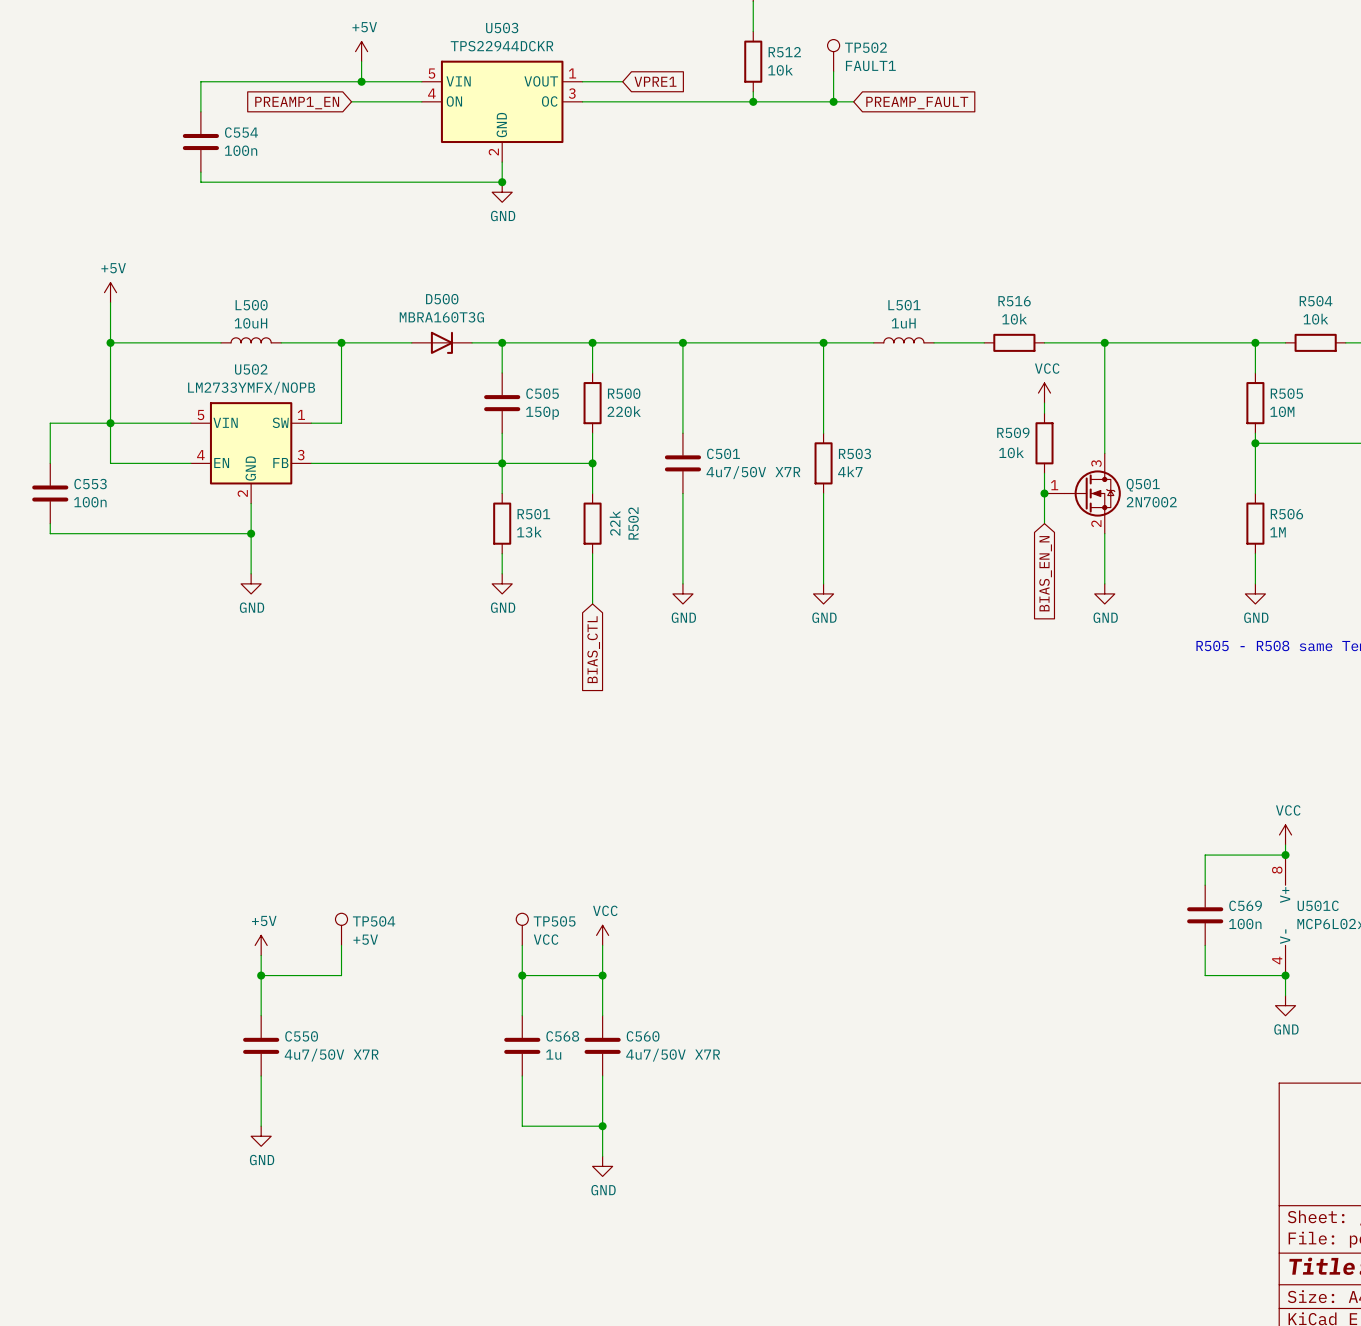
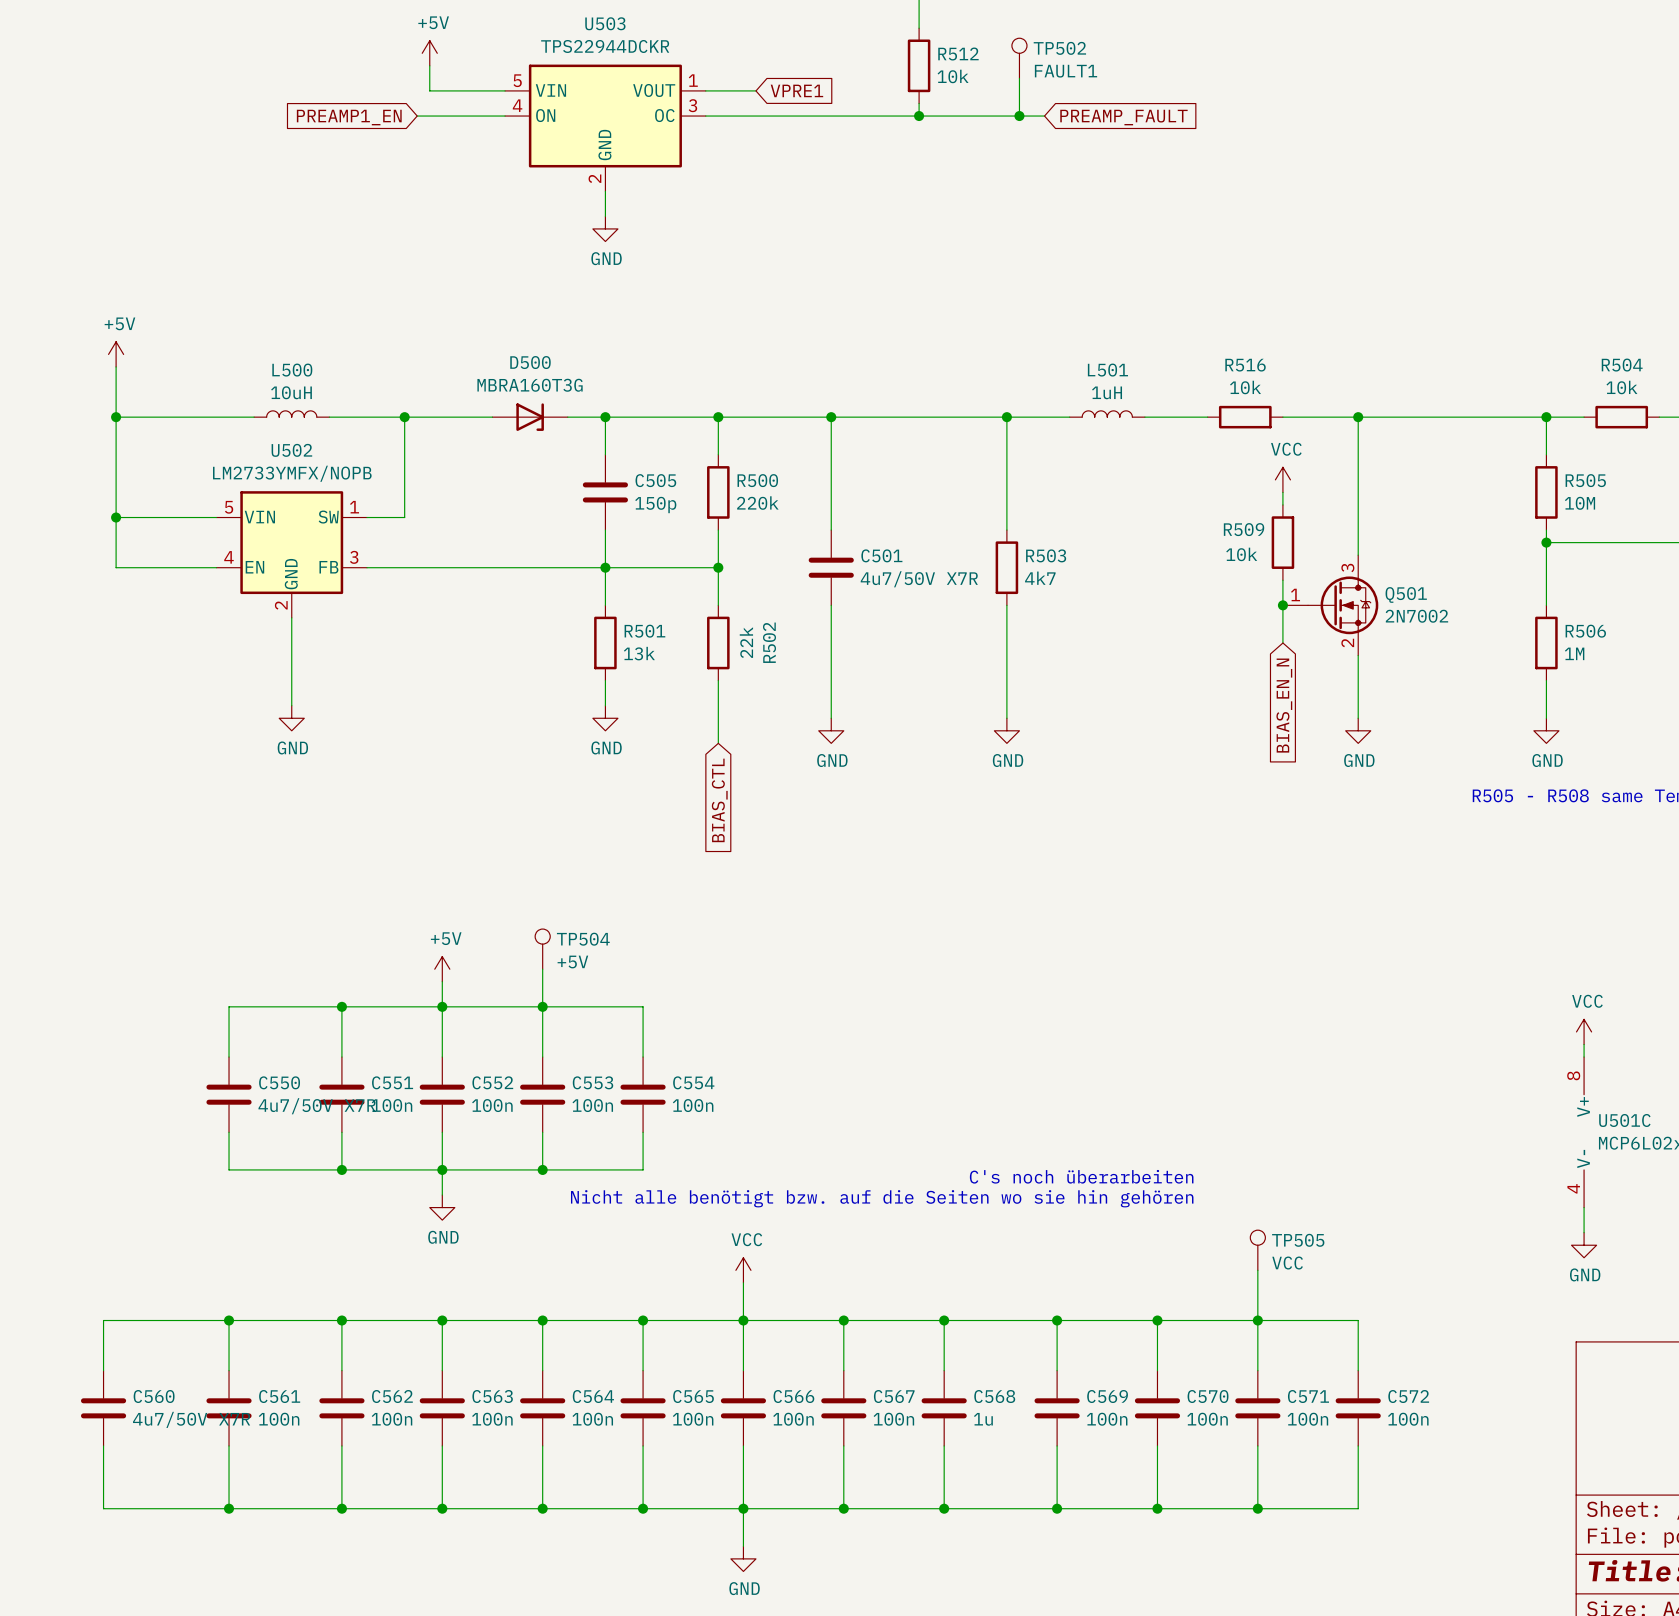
wire: (361, 81) (200, 81) (200, 111) -> none
junction: (361, 81) -> none
C554 position: (200, 142) -> (643, 1094)
wire: (200, 172) (200, 182) (502, 182) -> none
junction: (502, 182) -> none
wire: (110, 423) (50, 423) (50, 463) -> none
C553 position: (50, 493) -> (542, 1094)
wire: (50, 523) (50, 533) (251, 533) -> none
junction: (251, 533) -> none
wire: none -> (341, 1006) (341, 1057)
junction: none -> (341, 1006)
junction: none -> (442, 1006)
junction: none -> (542, 1006)
wire: none -> (229, 1057) (229, 1006) (643, 1006) (643, 1057)
wire: (1285, 855) (1205, 855) (1205, 885) -> none
junction: (1285, 855) -> none
C551: none -> 100n (341, 1094)
C552: none -> 100n (442, 1094)
wire: none -> (229, 1132) (229, 1169) (643, 1169) (643, 1132)
wire: none -> (341, 1132) (341, 1169)
wire: none -> (542, 1132) (542, 1169)
C569 position: (1205, 915) -> (1057, 1408)
TP504 position: (341, 929) -> (542, 949)
TP505 position: (522, 929) -> (1257, 1250)
power symbol position: VCC (602, 935) -> VCC (743, 1270)
power symbol position: +5V (261, 945) -> +5V (442, 969)
wire: (341, 945) (341, 975) (261, 975) -> none
junction: none -> (442, 1169)
junction: none -> (542, 1169)
wire: (522, 945) (522, 1015) -> (542, 969) (542, 1057)
wire: (602, 945) (602, 1015) -> (743, 1282) (743, 1370)
wire: (1205, 945) (1205, 975) (1285, 975) -> none
text: none -> C's noch überarbeiten (1081, 1176)
wire: (261, 955) (261, 1015) -> (442, 981) (442, 1057)
text: none -> Nicht alle benötigt bzw. auf die Seiten wo sie hin gehören (882, 1198)
junction position: (261, 975) -> (341, 1169)
power symbol: none -> GND (442, 1207)
wire: (522, 975) (602, 975) -> none
junction: (522, 975) -> none
junction: (602, 975) -> none
junction: (1285, 975) -> none
wire: none -> (1257, 1270) (1257, 1370)
C550 position: (261, 1045) -> (229, 1094)
C568 position: (522, 1045) -> (944, 1408)
C560 position: (602, 1045) -> (103, 1408)
wire: none -> (229, 1320) (229, 1370)
junction: none -> (229, 1320)
wire: none -> (341, 1320) (341, 1370)
junction: none -> (341, 1320)
wire: none -> (442, 1320) (442, 1370)
junction: none -> (442, 1320)
wire: none -> (542, 1320) (542, 1370)
junction: none -> (542, 1320)
wire: none -> (643, 1320) (643, 1370)
junction: none -> (643, 1320)
junction: none -> (743, 1320)
wire: none -> (843, 1320) (843, 1370)
junction: none -> (843, 1320)
wire: none -> (944, 1320) (944, 1370)
junction: none -> (944, 1320)
wire: none -> (1057, 1320) (1057, 1370)
junction: none -> (1057, 1320)
wire: none -> (1157, 1320) (1157, 1370)
junction: none -> (1157, 1320)
junction: none -> (1257, 1320)
wire: (261, 1075) (261, 1126) -> (442, 1132) (442, 1195)
wire: (522, 1075) (522, 1126) (602, 1126) -> none
wire: (602, 1075) (602, 1156) -> (743, 1445) (743, 1546)
wire: none -> (103, 1370) (103, 1320) (1358, 1320) (1358, 1370)
junction: (602, 1126) -> none
C561: none -> 100n (229, 1408)
power symbol: GND (261, 1136) -> none
C562: none -> 100n (341, 1408)
C563: none -> 100n (442, 1408)
C564: none -> 100n (542, 1408)
C565: none -> 100n (643, 1408)
C566: none -> 100n (743, 1408)
C567: none -> 100n (843, 1408)
C570: none -> 100n (1157, 1408)
C571: none -> 100n (1257, 1408)
C572: none -> 100n (1358, 1408)
wire: none -> (103, 1445) (103, 1508) (1358, 1508) (1358, 1445)
wire: none -> (229, 1445) (229, 1508)
wire: none -> (341, 1445) (341, 1508)
wire: none -> (442, 1445) (442, 1508)
wire: none -> (542, 1445) (542, 1508)
wire: none -> (643, 1445) (643, 1508)
power symbol position: GND (602, 1166) -> GND (743, 1558)
wire: none -> (843, 1445) (843, 1508)
wire: none -> (944, 1445) (944, 1508)
wire: none -> (1057, 1445) (1057, 1508)
wire: none -> (1157, 1445) (1157, 1508)
wire: none -> (1257, 1445) (1257, 1508)
junction: none -> (229, 1508)
junction: none -> (341, 1508)
junction: none -> (442, 1508)
junction: none -> (542, 1508)
junction: none -> (643, 1508)
junction: none -> (743, 1508)
junction: none -> (843, 1508)
junction: none -> (944, 1508)
junction: none -> (1057, 1508)
junction: none -> (1157, 1508)
junction: none -> (1257, 1508)

